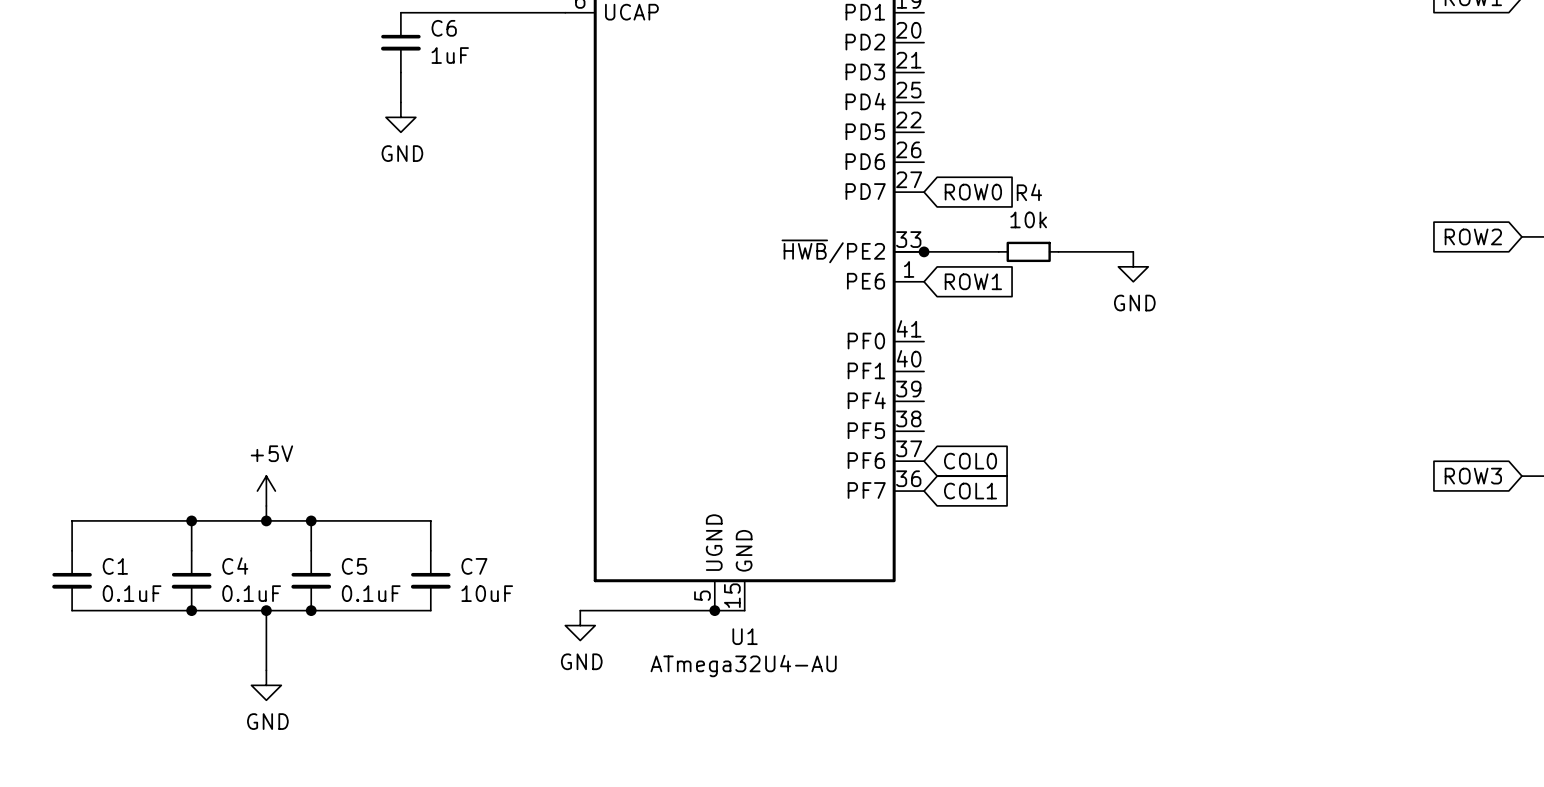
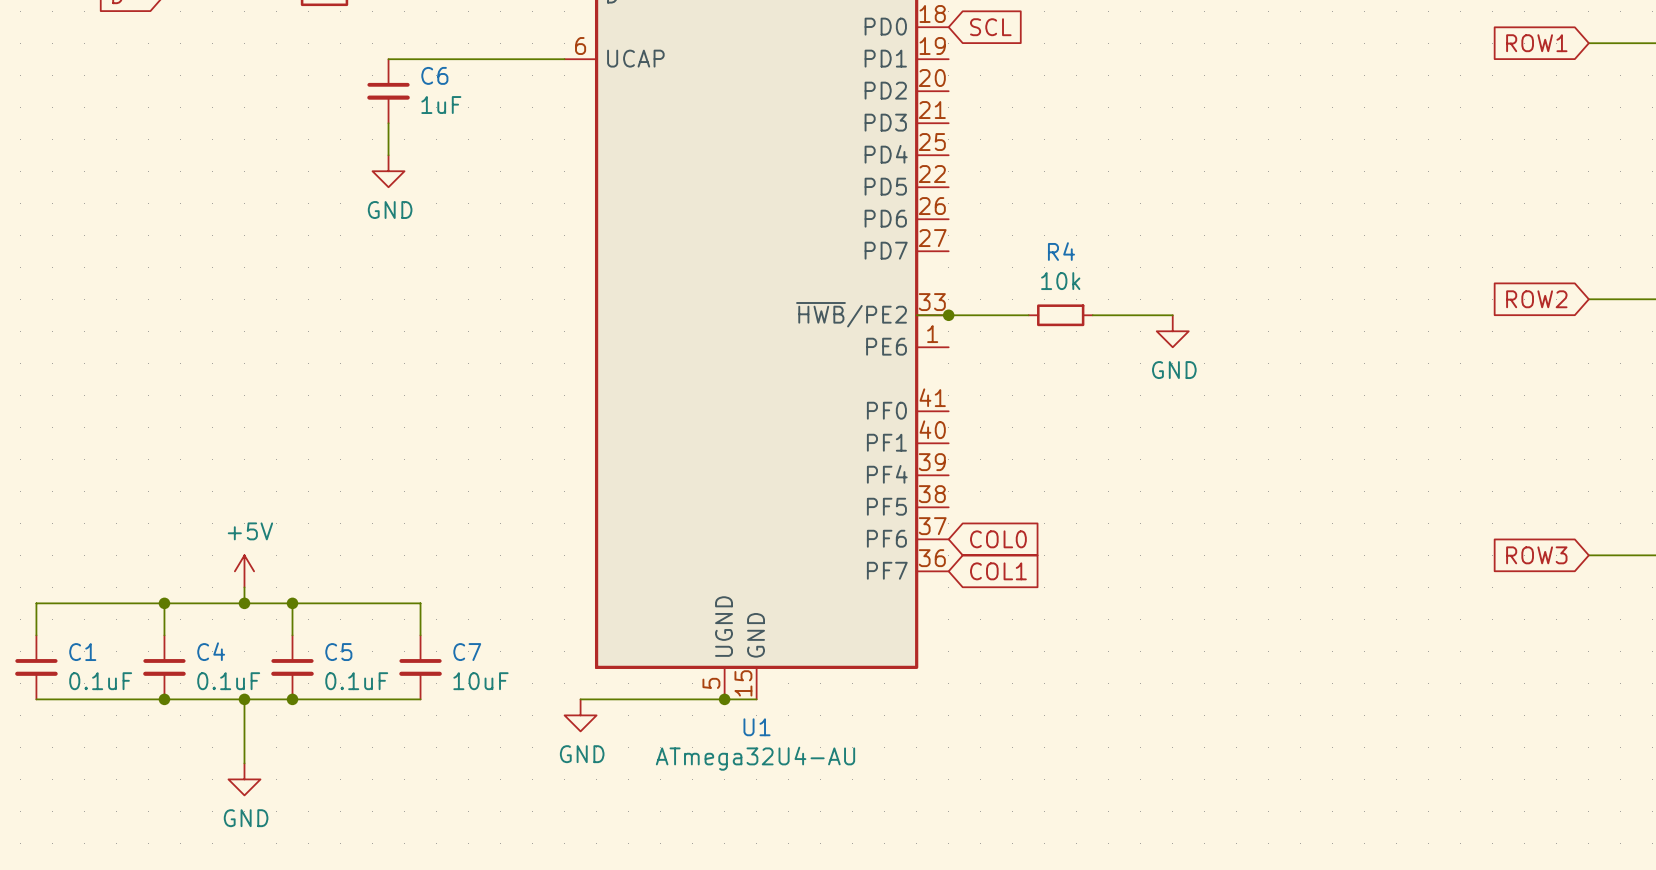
global label: ROW0 (973, 192) -> none
global label: ROW1 (973, 281) -> none

